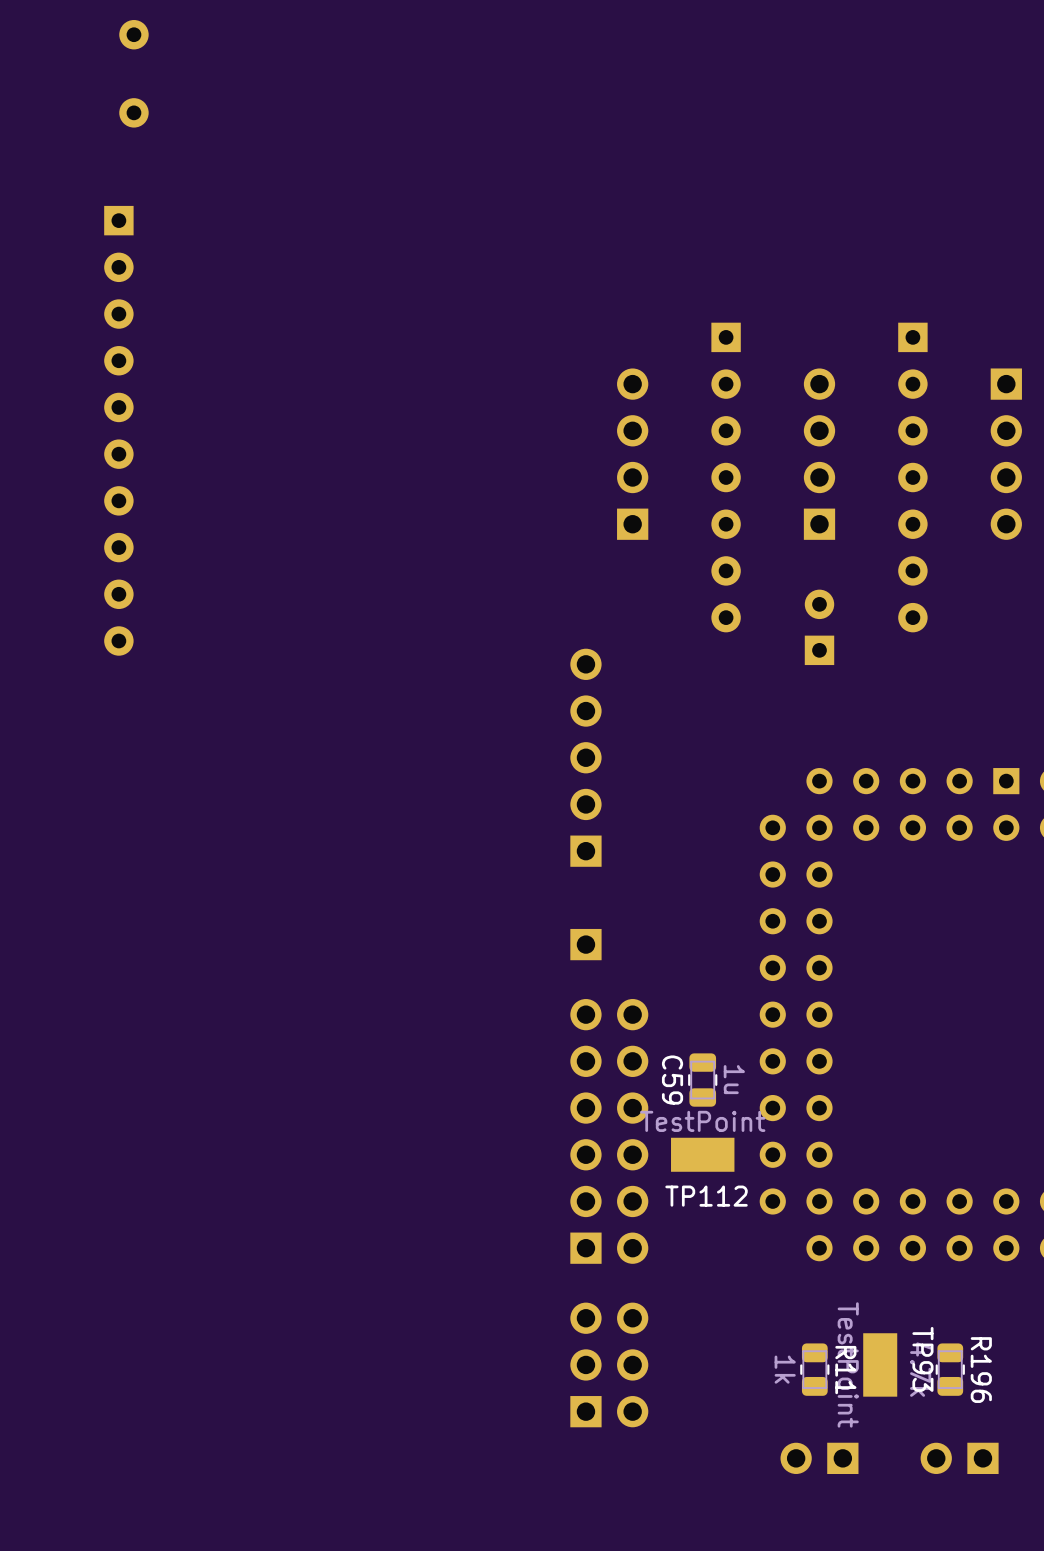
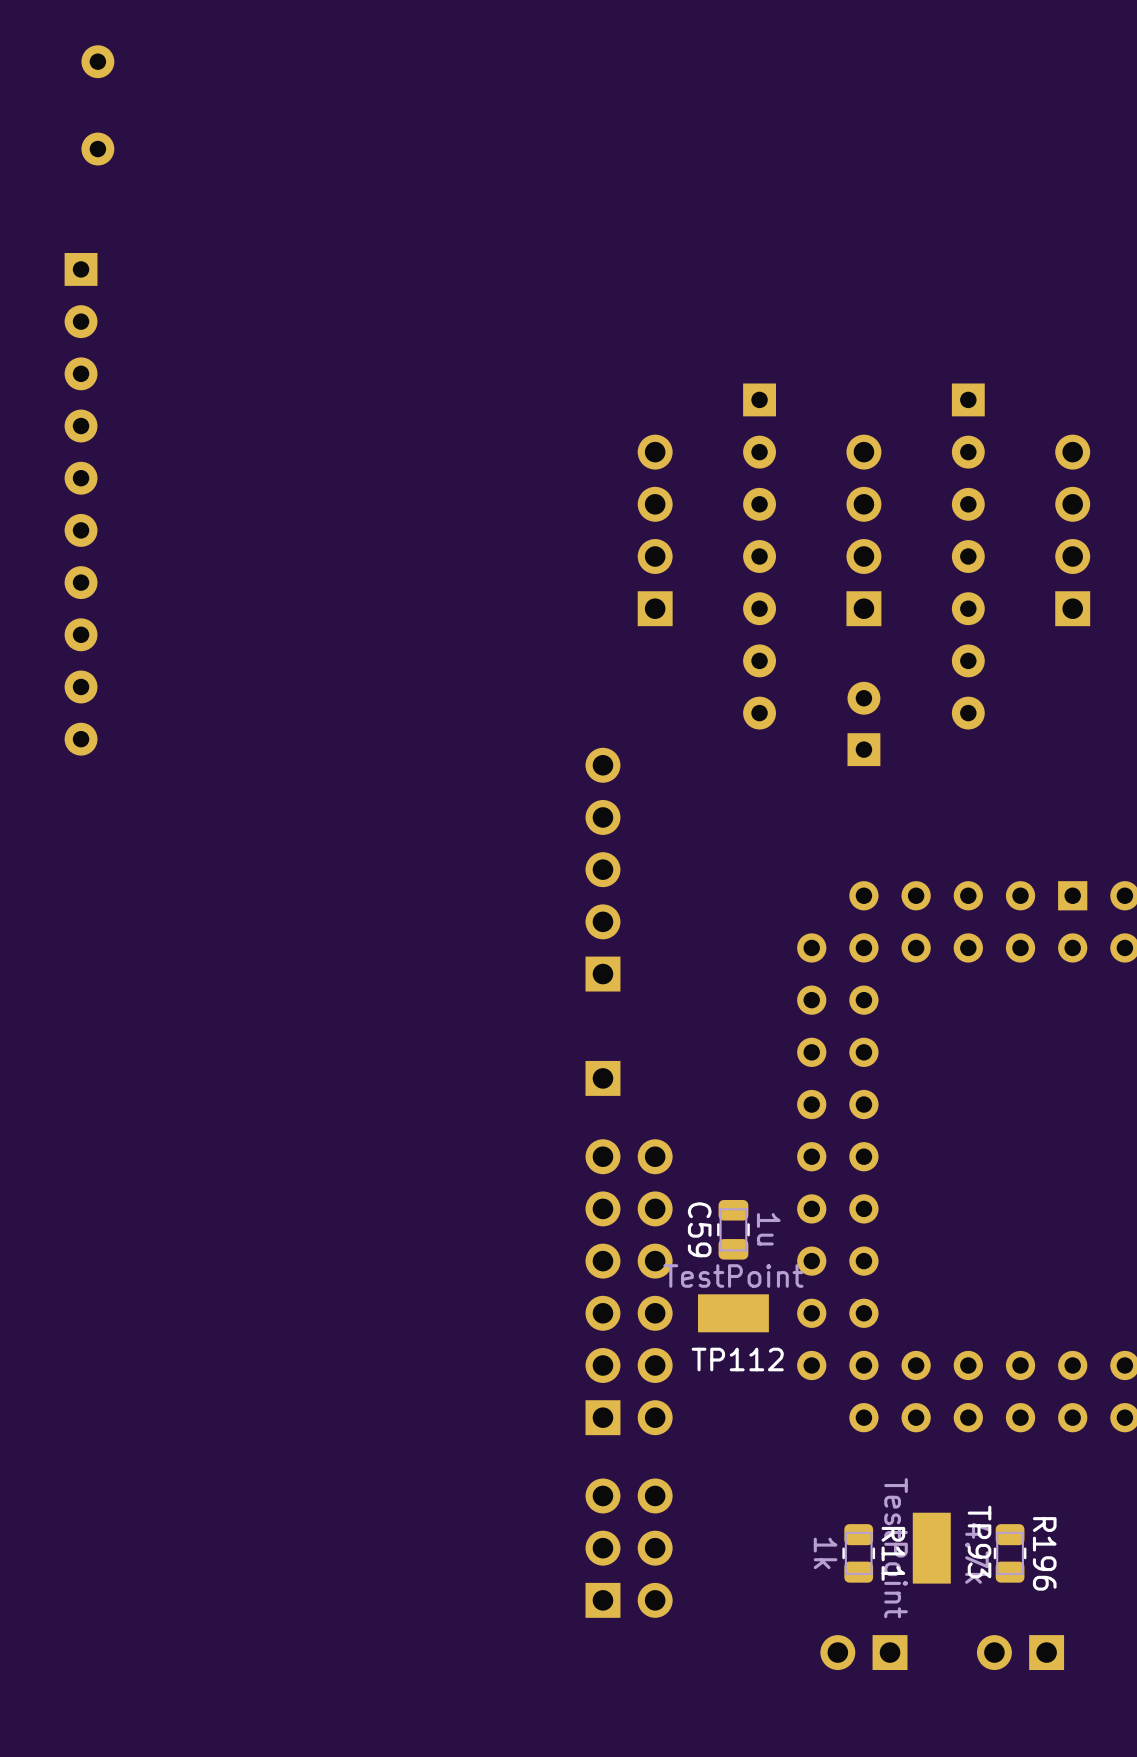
part rotation: 0° (1006, 454) -> 180° (1072, 530)

